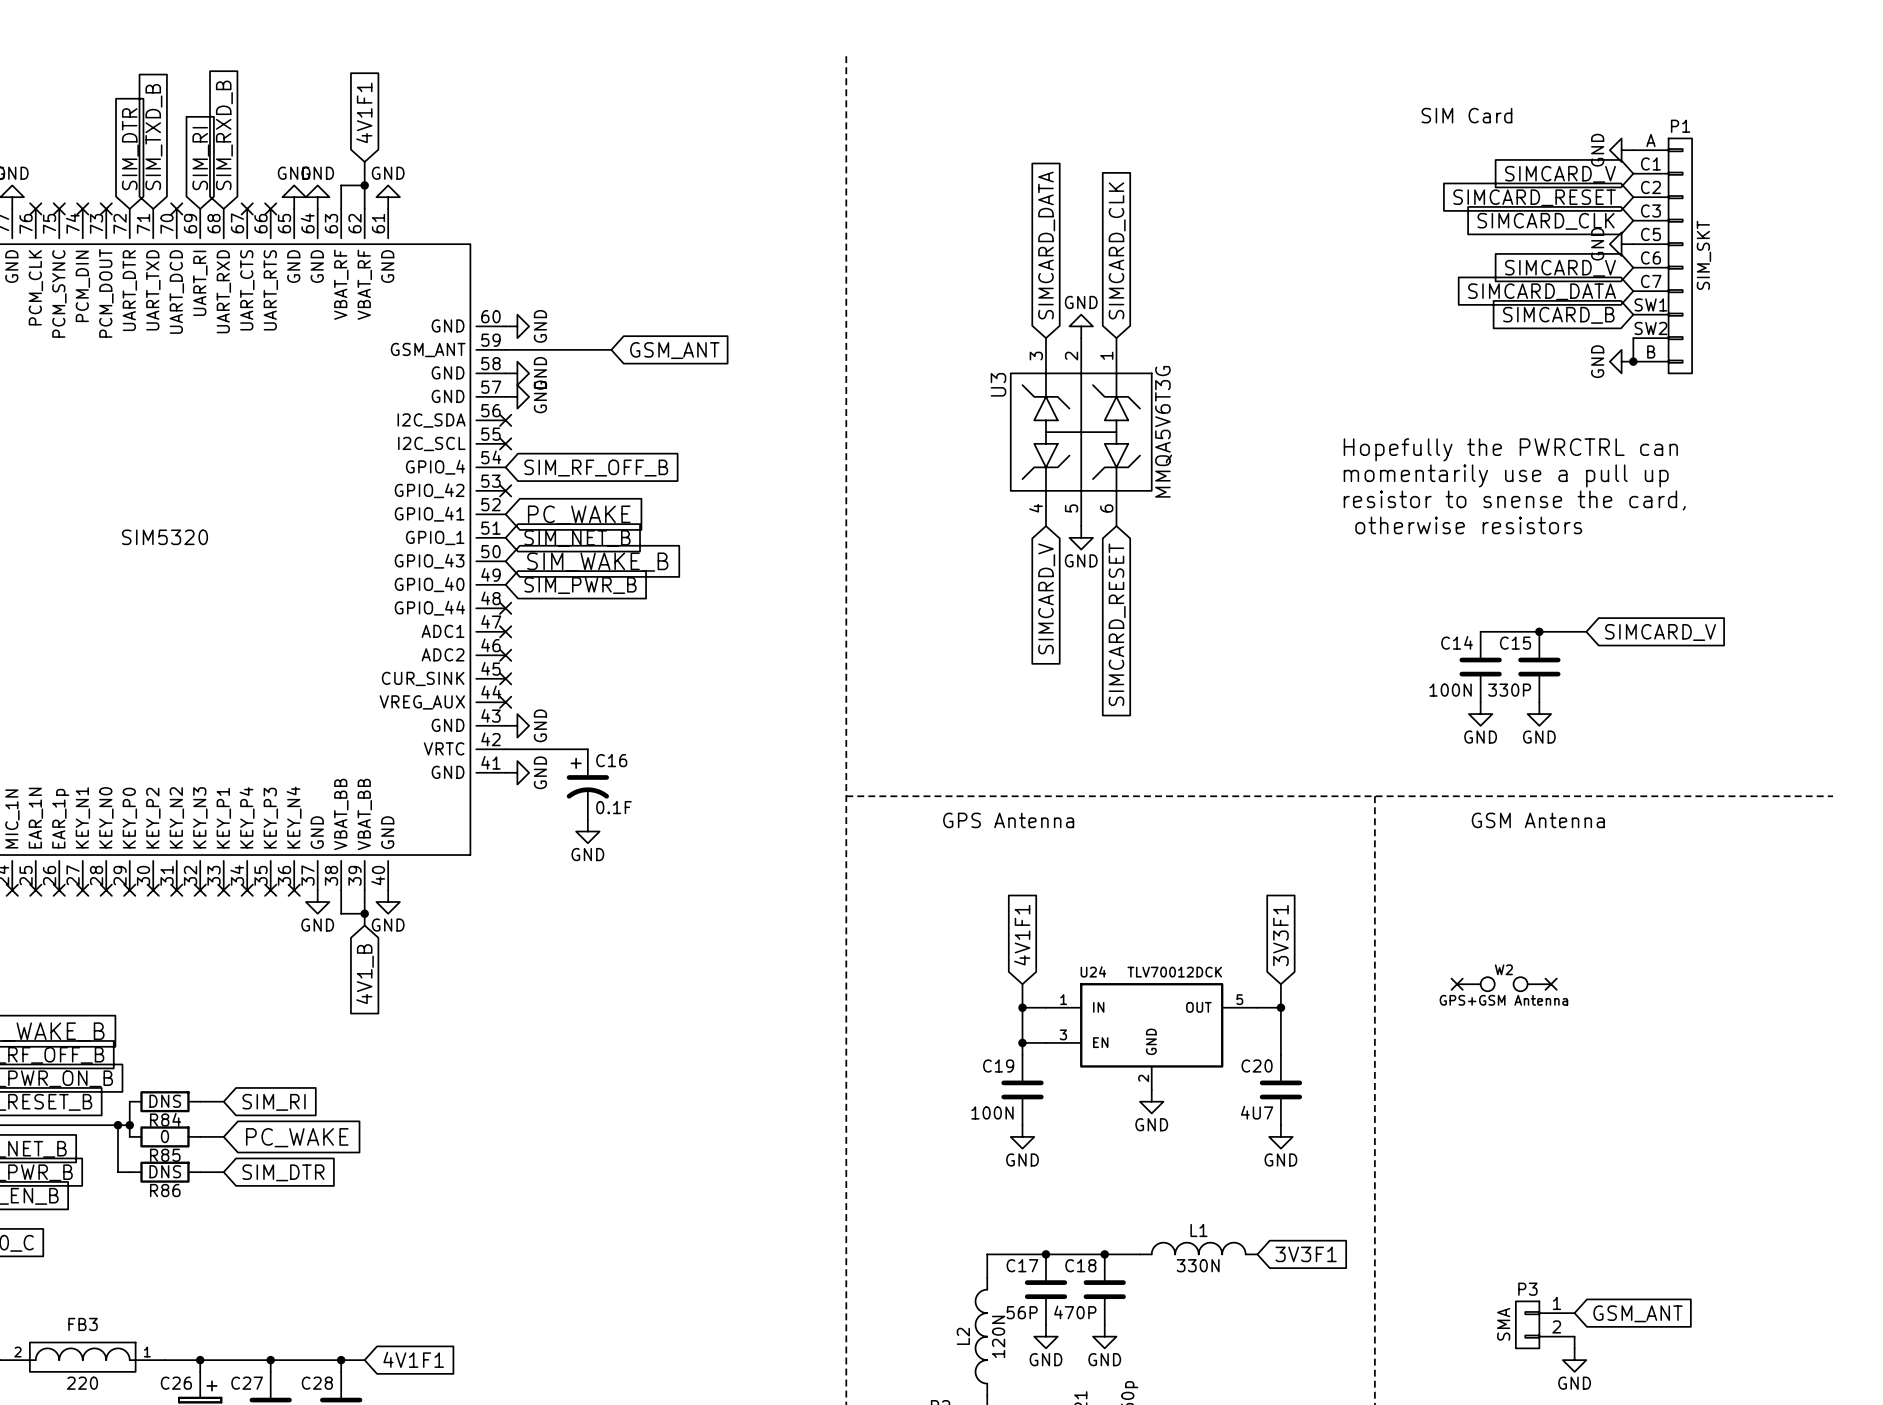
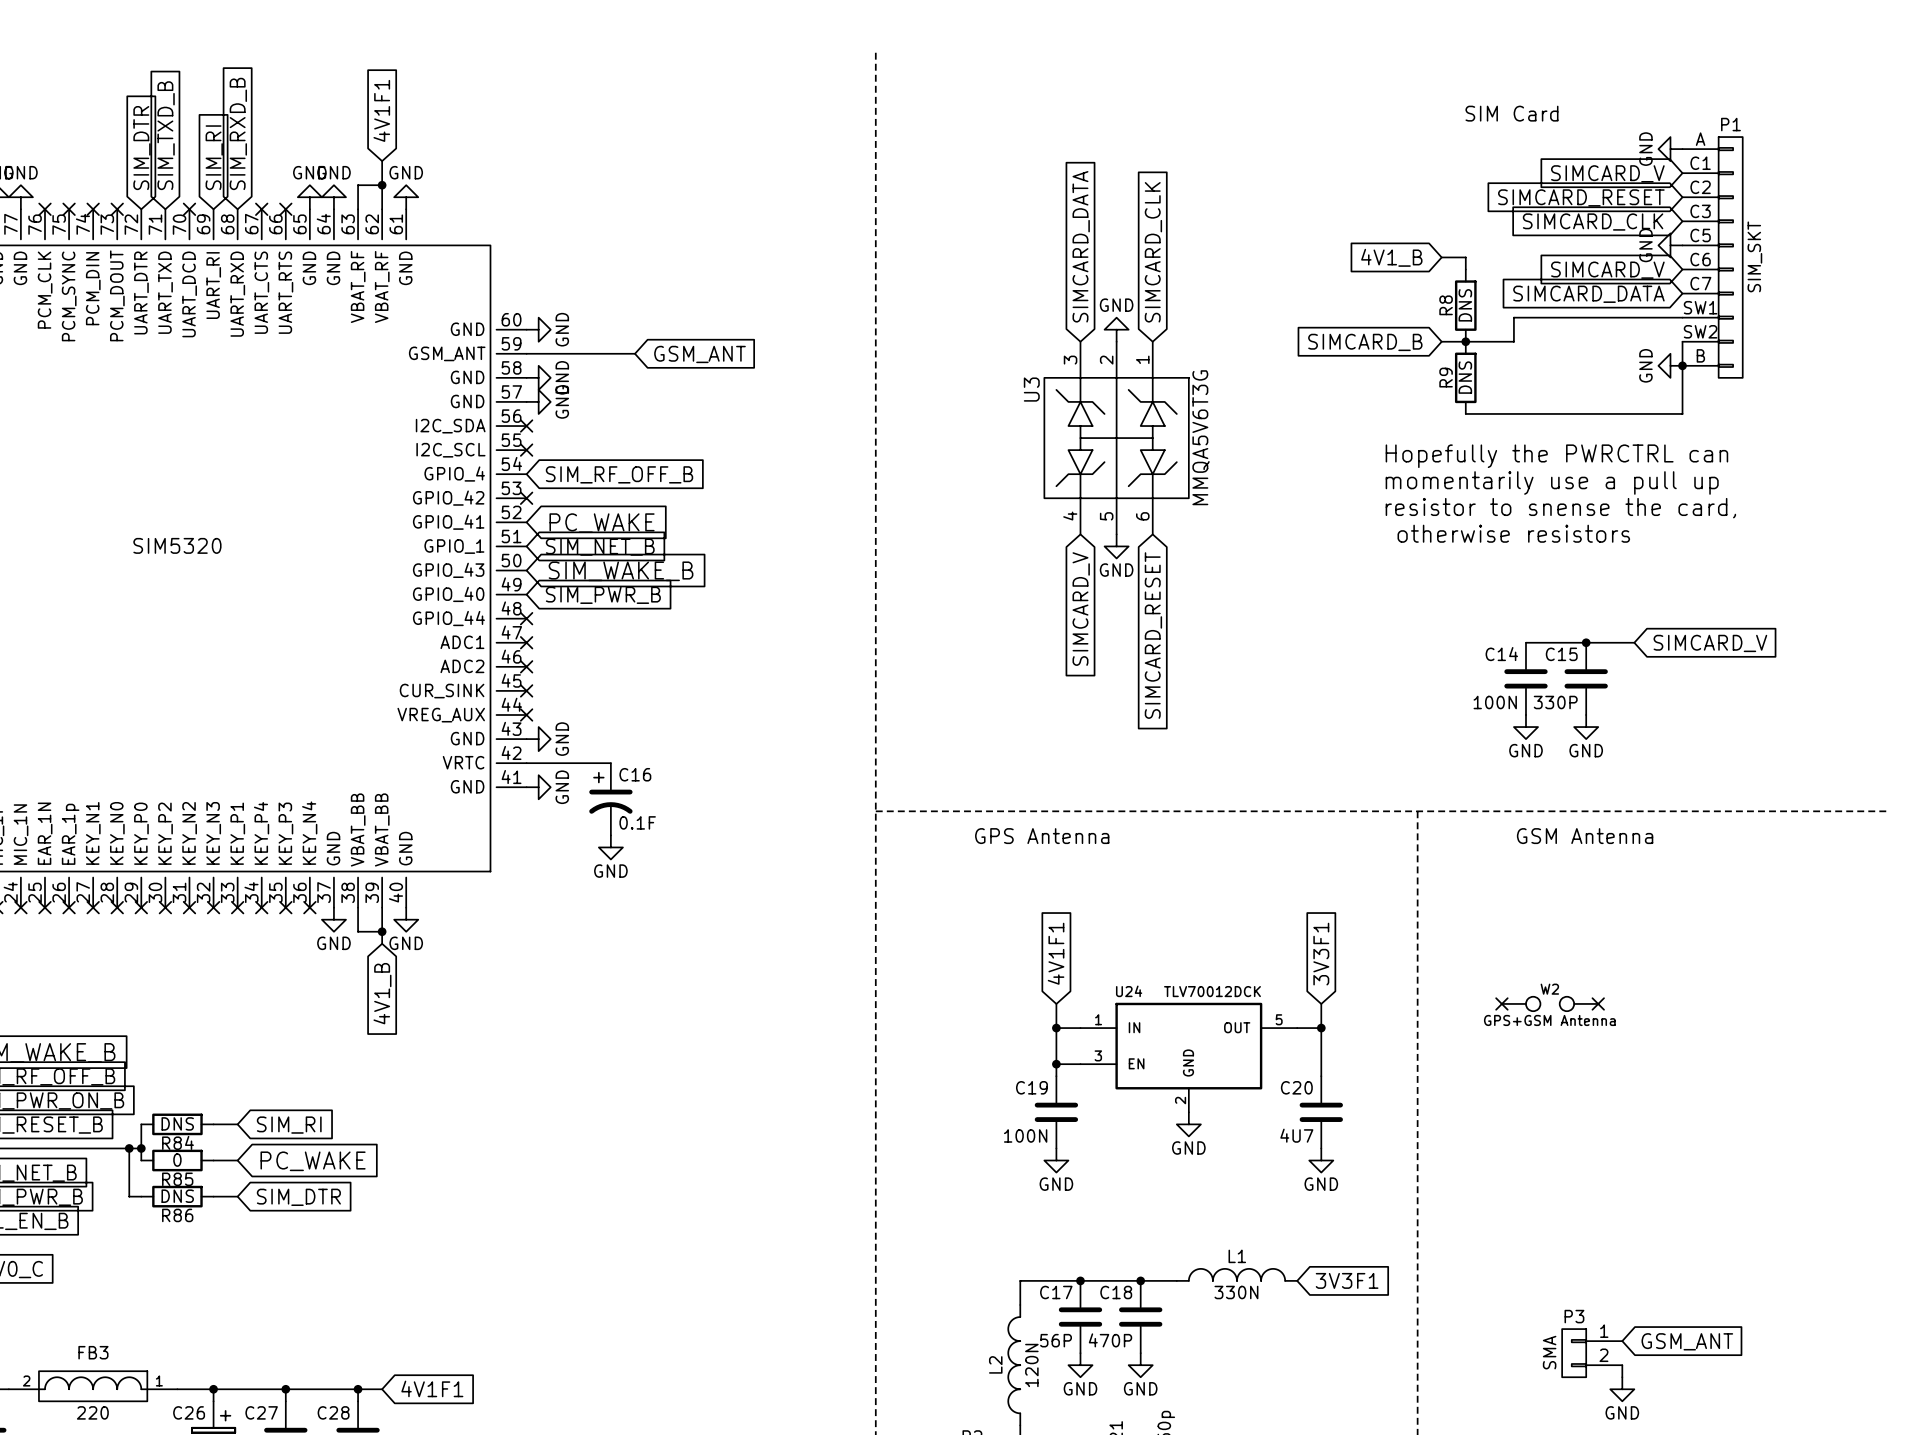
wire: none -> (1441, 257) (1465, 257) (1465, 269)
global label: none -> 4V1_B (1391, 257)
R8: none -> DNS (1465, 305)
wire: none -> (1682, 317) (1513, 317) (1513, 341) (1441, 341)
global label: SIMCARD_B (1558, 315) -> none
global label: none -> SIMCARD_B (1365, 342)
junction: none -> (1465, 341)
wire: none -> (1682, 365) (1682, 413) (1465, 413)
R9: none -> DNS (1465, 377)

